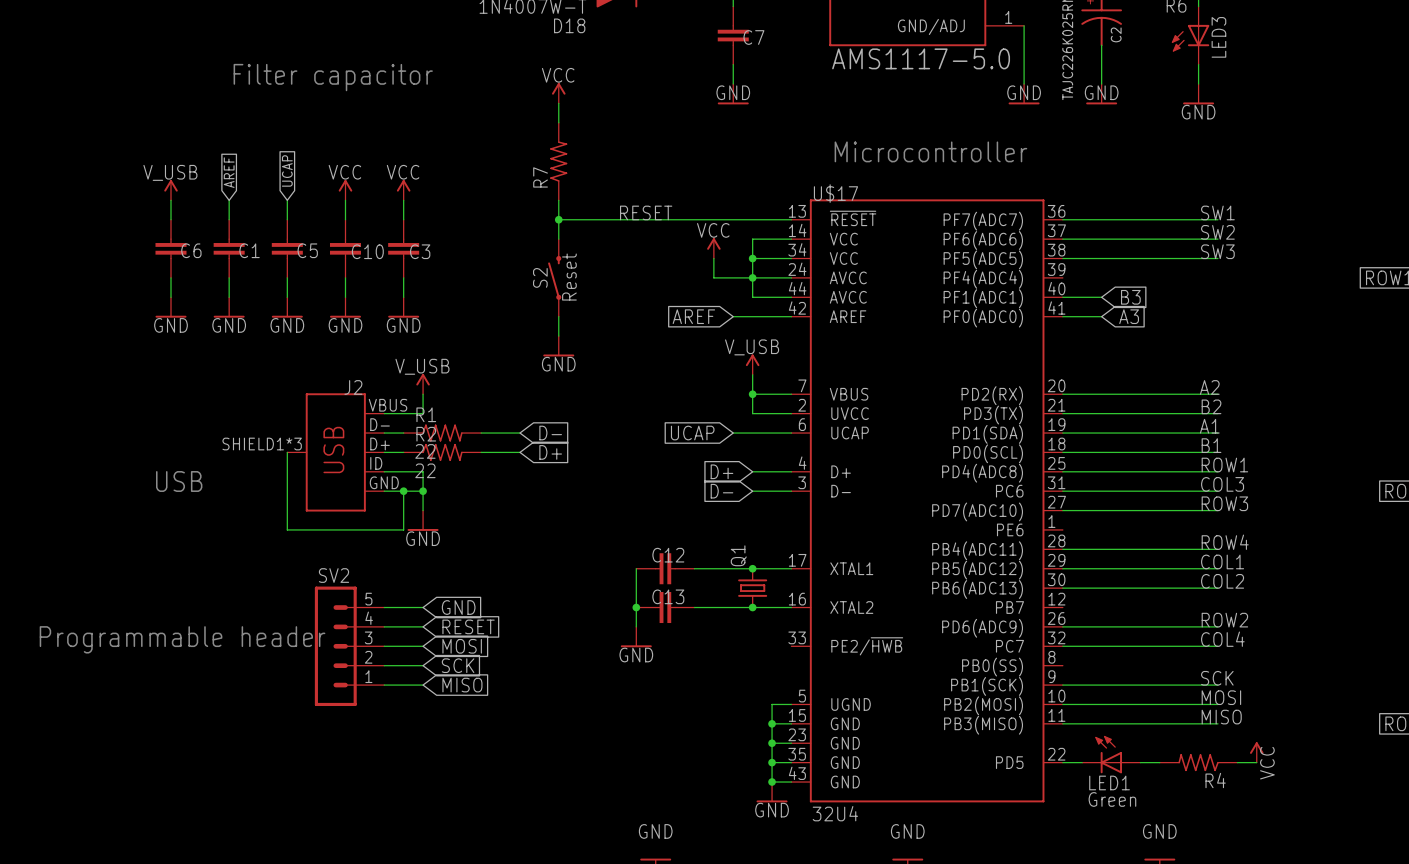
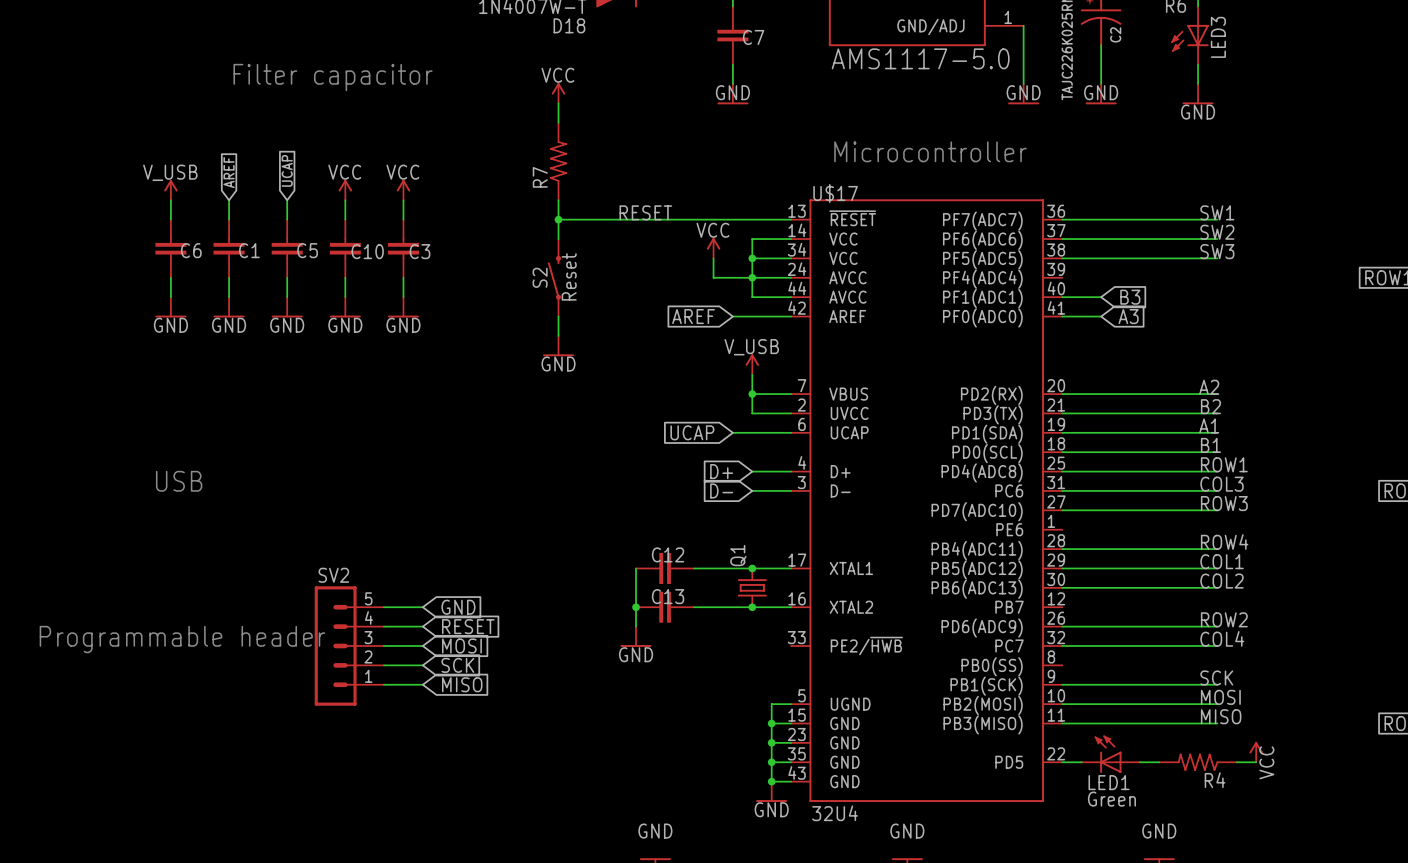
power symbol: V_USB (423, 384) -> none
wire: (423, 394) (423, 413) (384, 413) -> none
wire: (384, 433) (403, 433) -> none
R1: 22 (442, 433) -> none
wire: (481, 433) (519, 433) -> none
global label: D- (550, 433) -> none
wire: (287, 452) (287, 529) (403, 529) (403, 491) -> none
J2: (335, 452) -> none
wire: (384, 452) (403, 452) -> none
R2: 22 (442, 452) -> none
wire: (481, 452) (519, 452) -> none
global label: D+ (550, 452) -> none
wire: (384, 471) (423, 471) (423, 510) -> none
wire: (384, 491) (423, 491) -> none
junction: (403, 491) -> none
junction: (423, 491) -> none
power symbol: GND (423, 520) -> none

